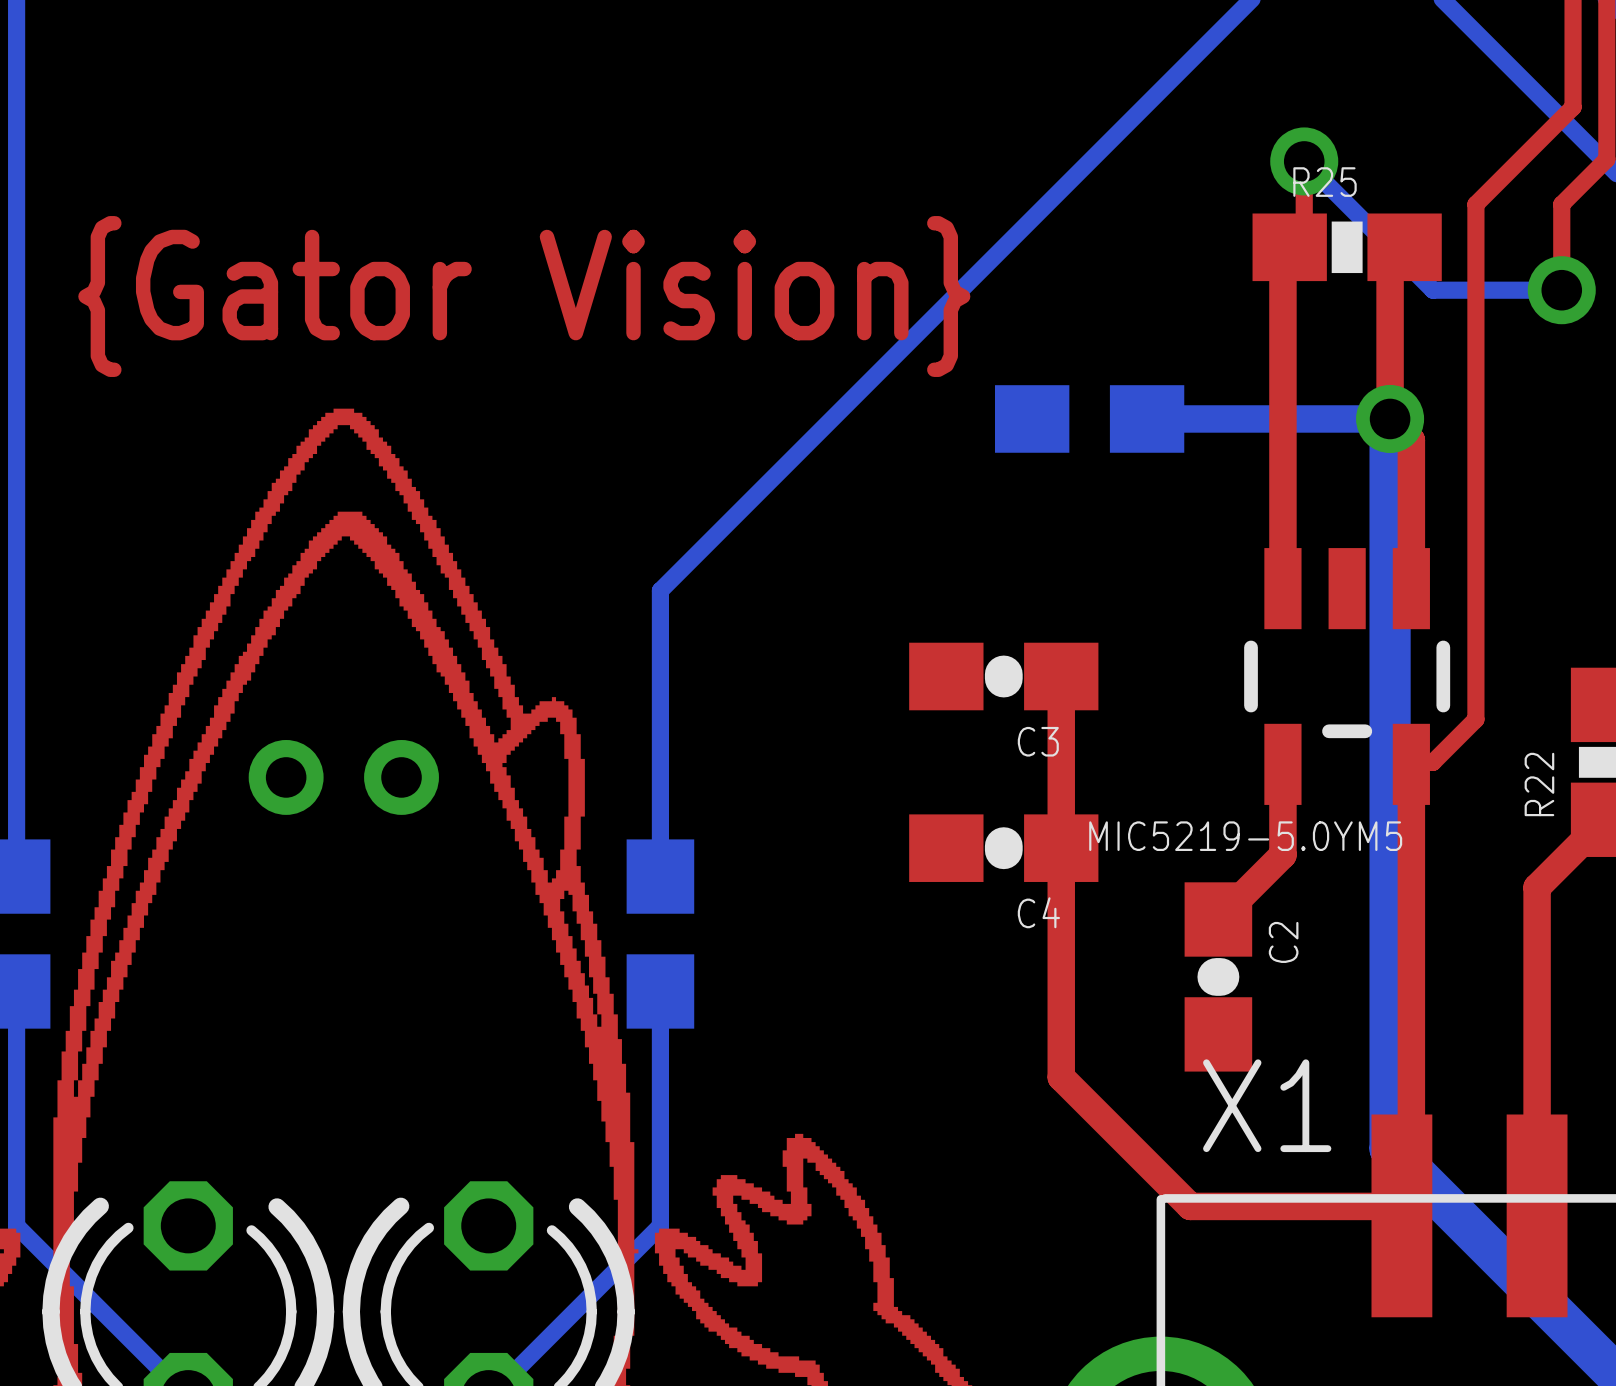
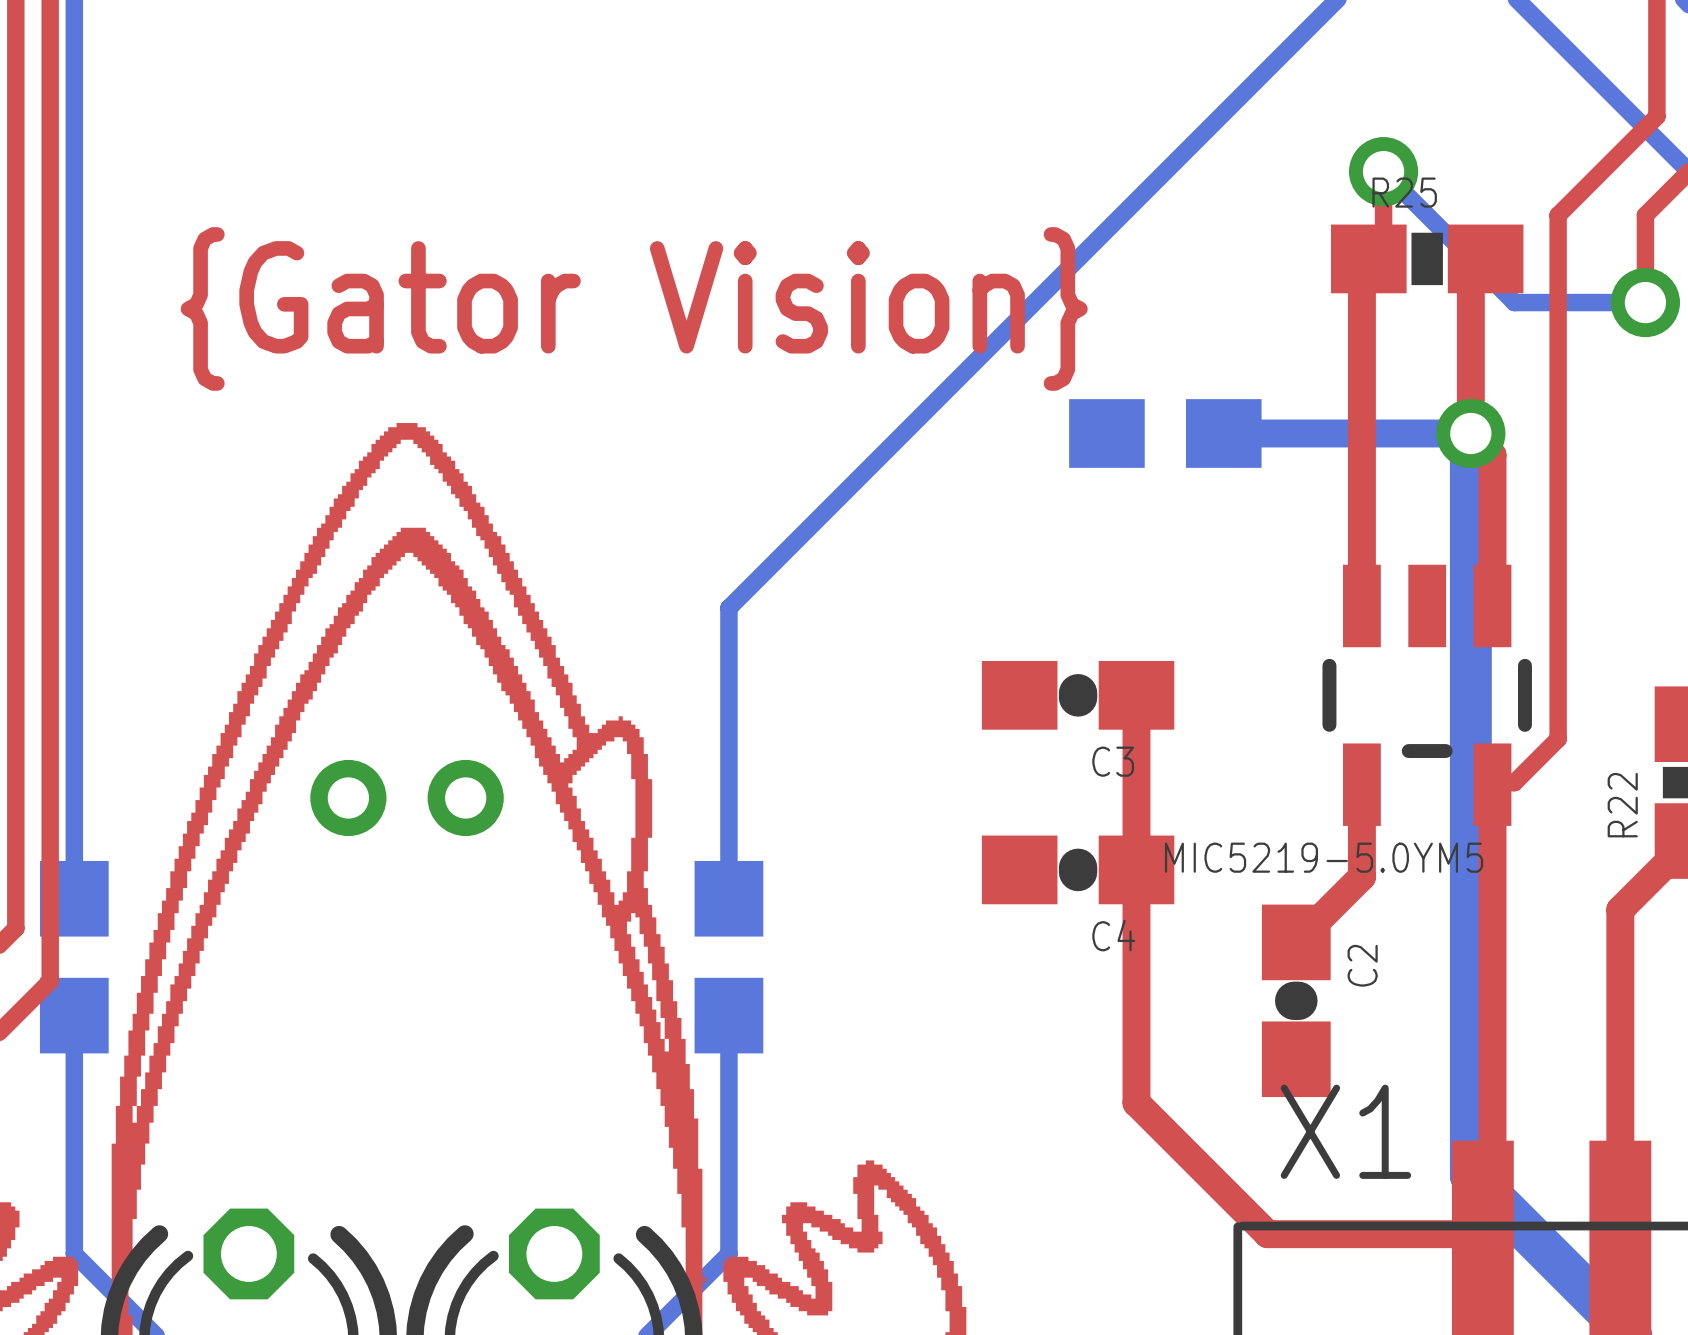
text position: {Gator Vision} (524, 296) -> {Gator Vision} (634, 308)

